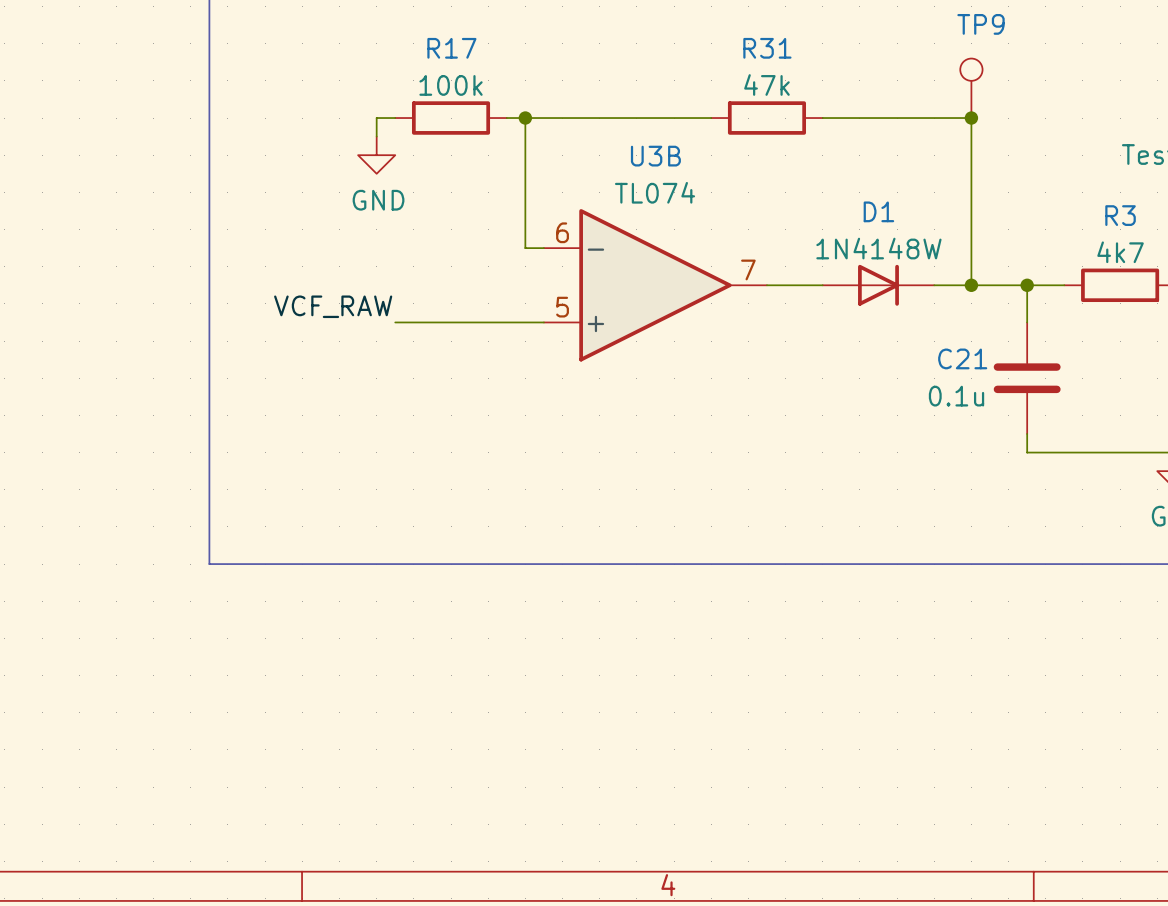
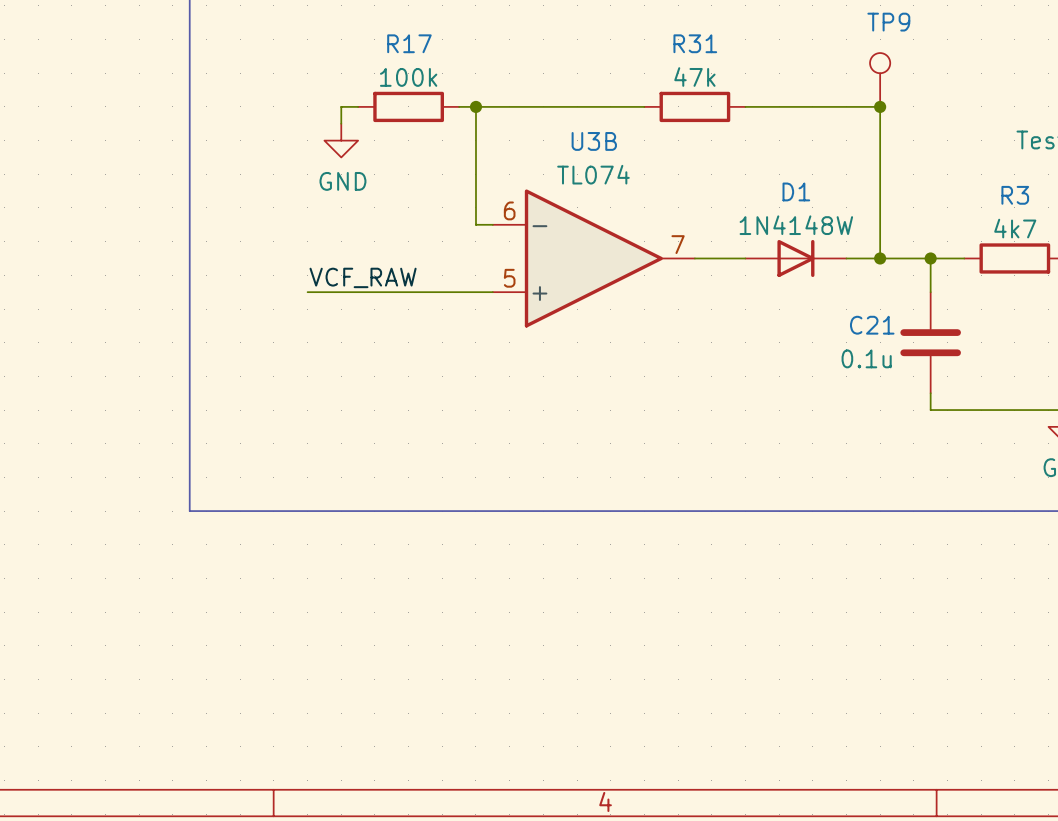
label position: VCF_RAW (333, 306) -> VCF_RAW (363, 277)
wire: none -> (307, 292) (358, 292)

